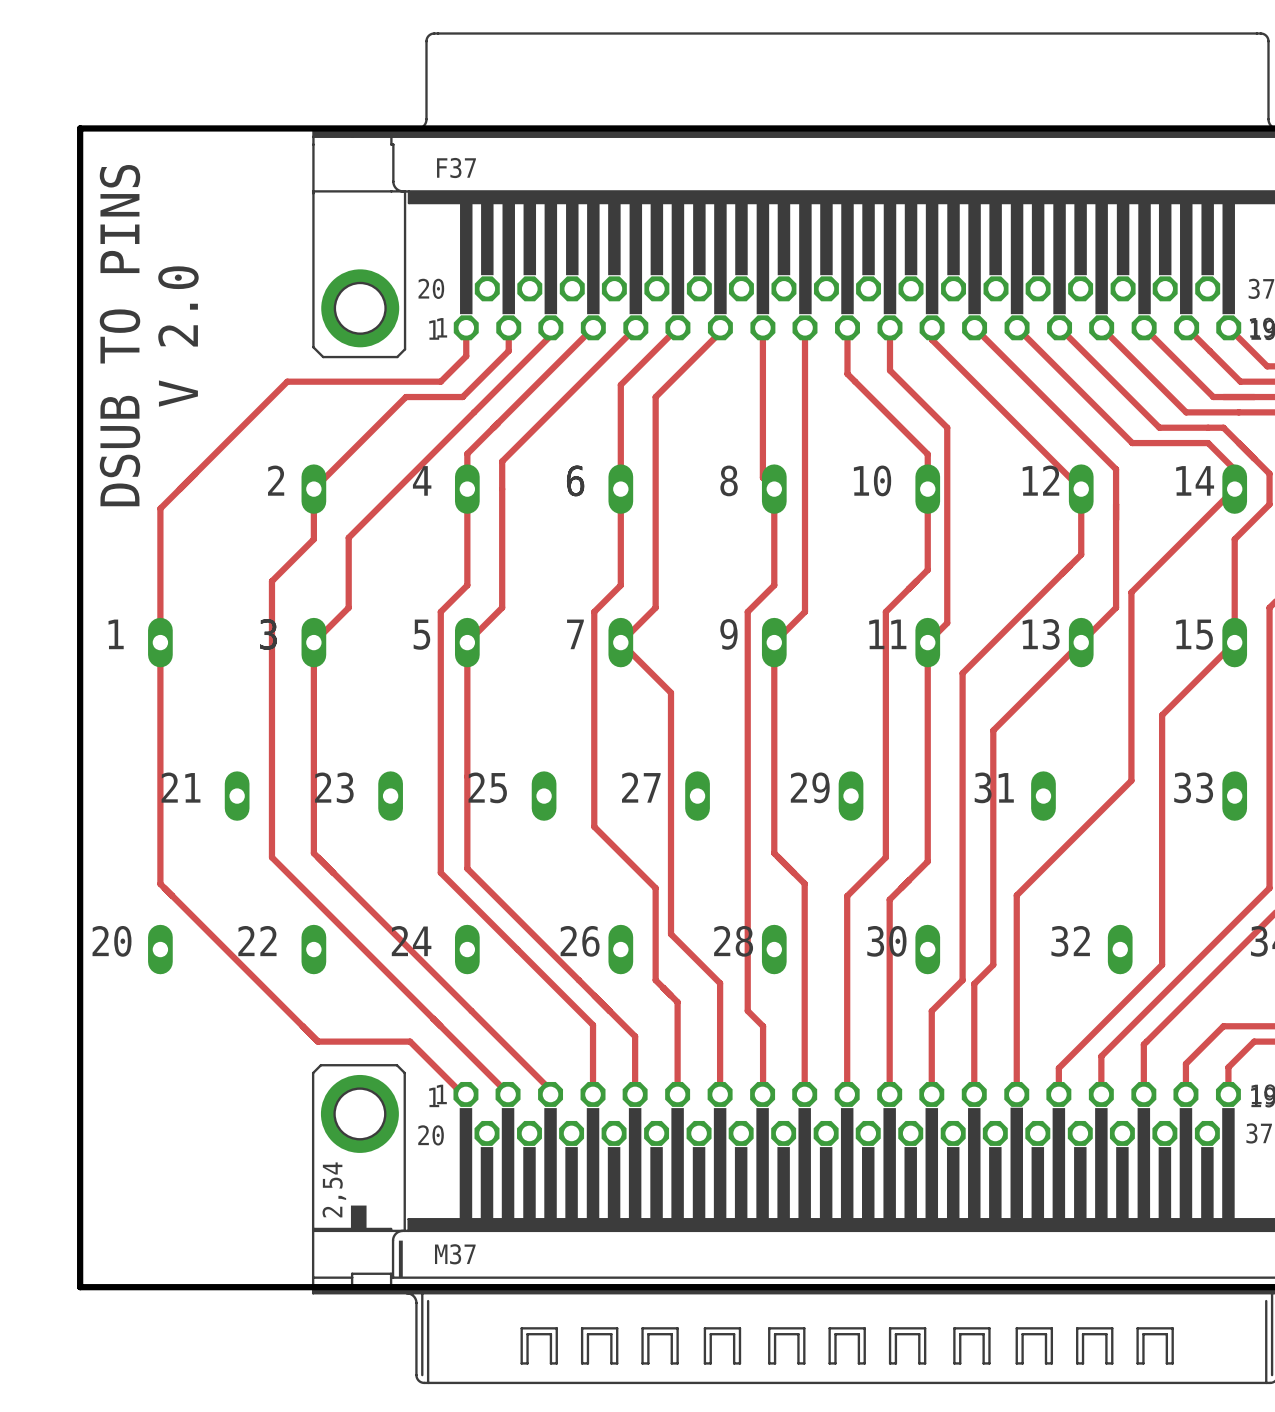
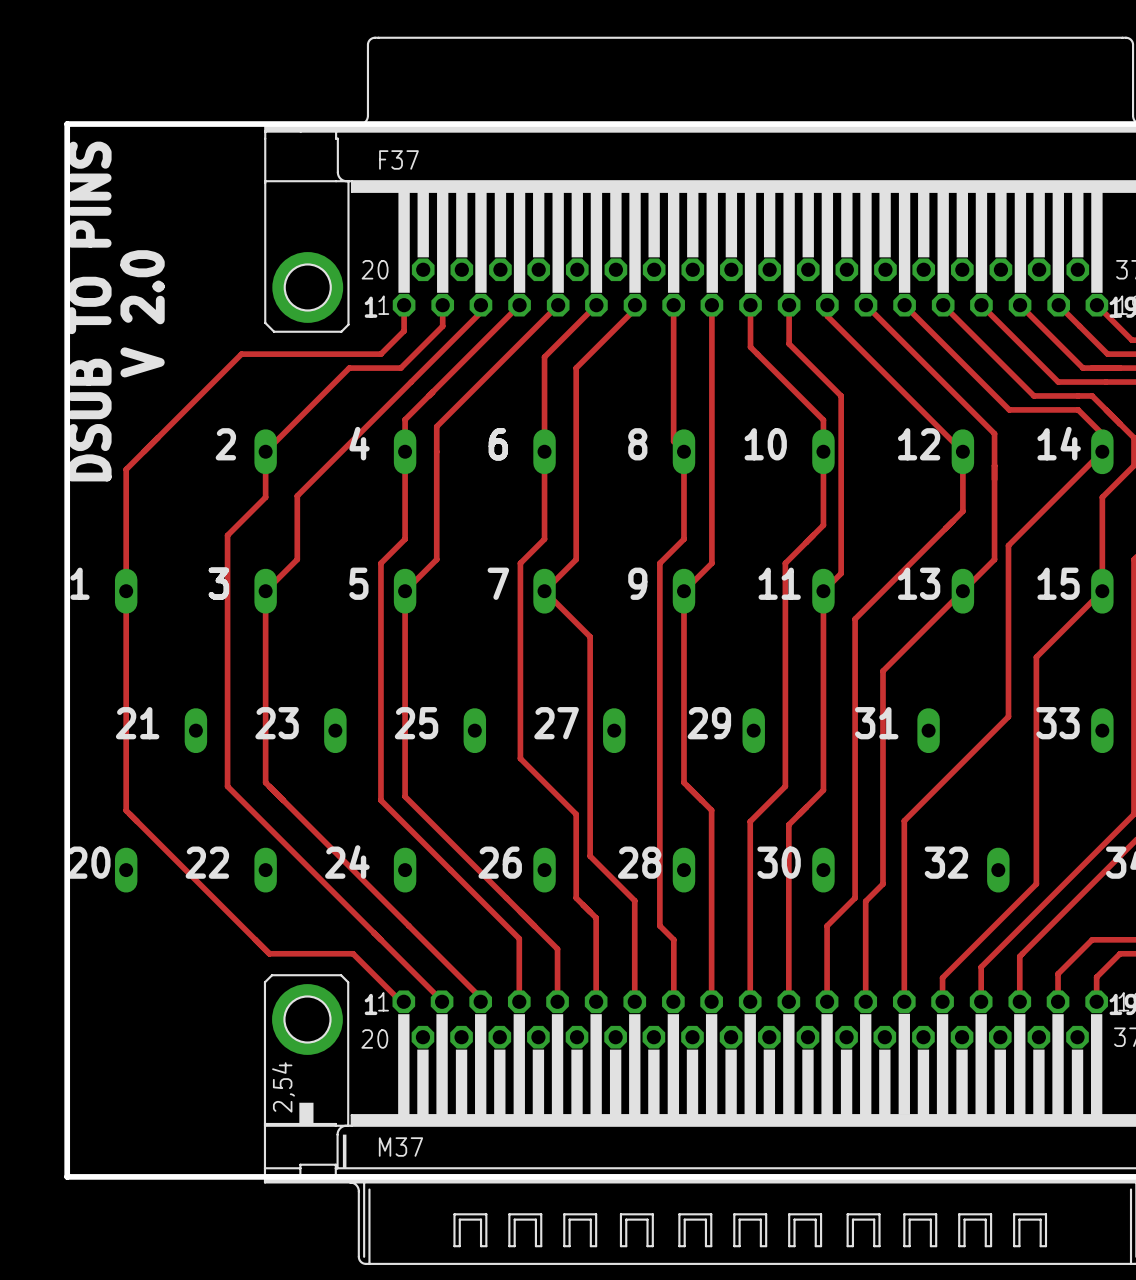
board edge: (95, 128) (80, 128) (80, 1287) (95, 1287) -> (67, 124) (67, 1176)
text position: 20 (112, 941) -> 20 (88, 862)

